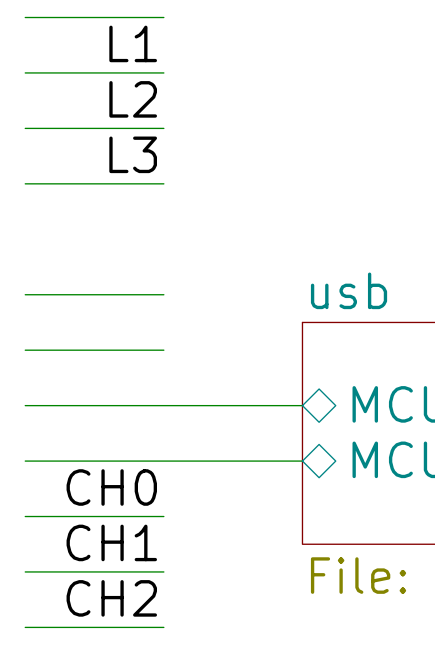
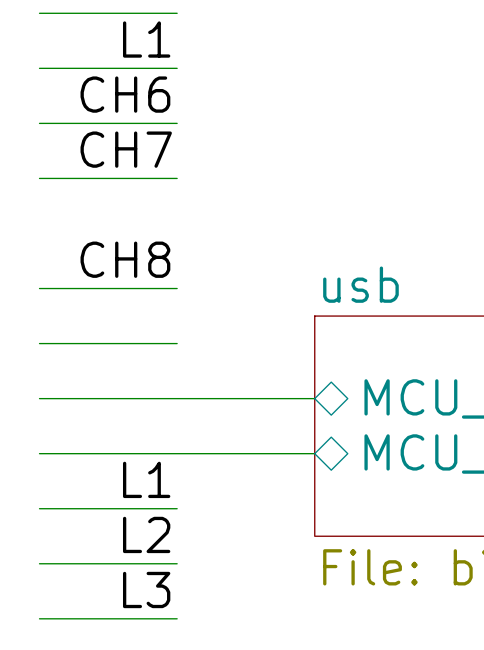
label: L2 (133, 99) -> CH6 (125, 94)
label: L3 (133, 154) -> CH7 (126, 149)
label: none -> CH8 (125, 259)
label: CH0 (111, 487) -> L1 (146, 479)
label: CH1 (111, 542) -> L2 (146, 534)
label: CH2 (111, 598) -> L3 (146, 589)

